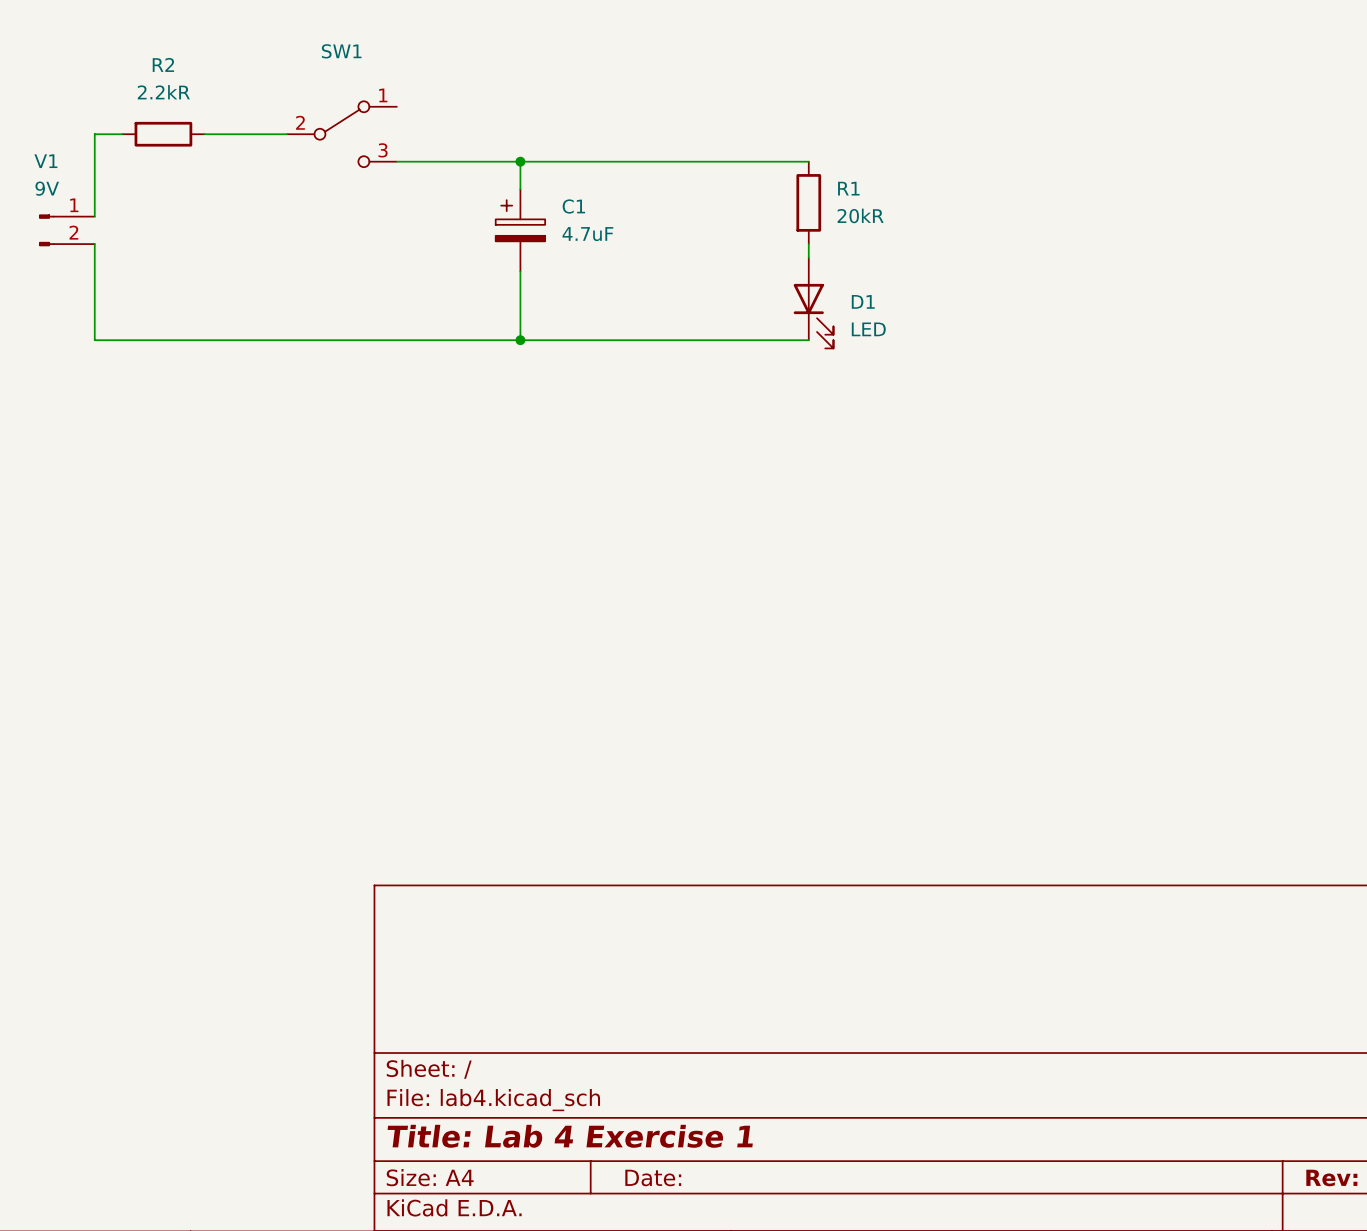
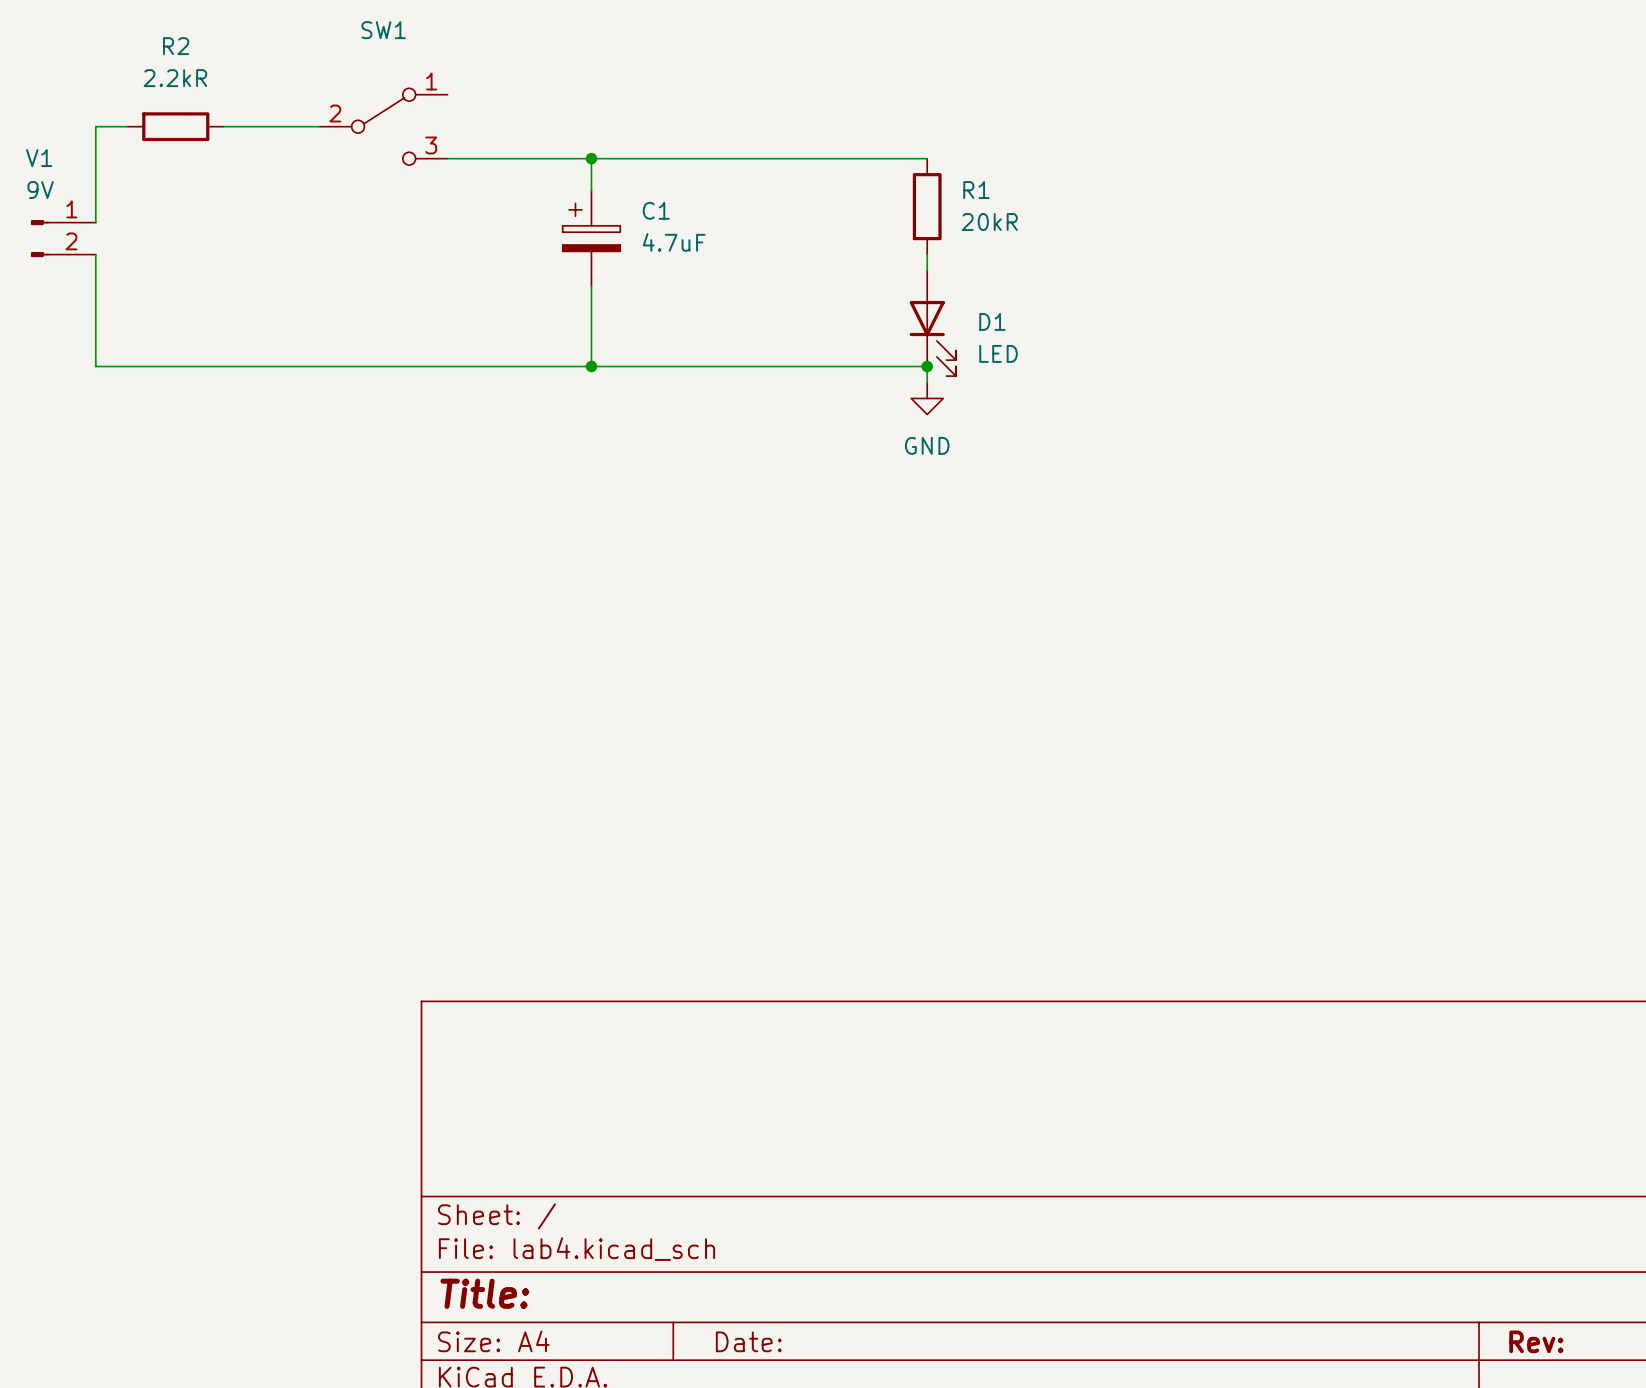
wire: none -> (927, 366) (927, 382)
junction: none -> (927, 366)
power symbol: none -> GND (927, 398)
title block: Title: Lab 4 Exercise 1 (570, 1136) -> Title: (484, 1293)

